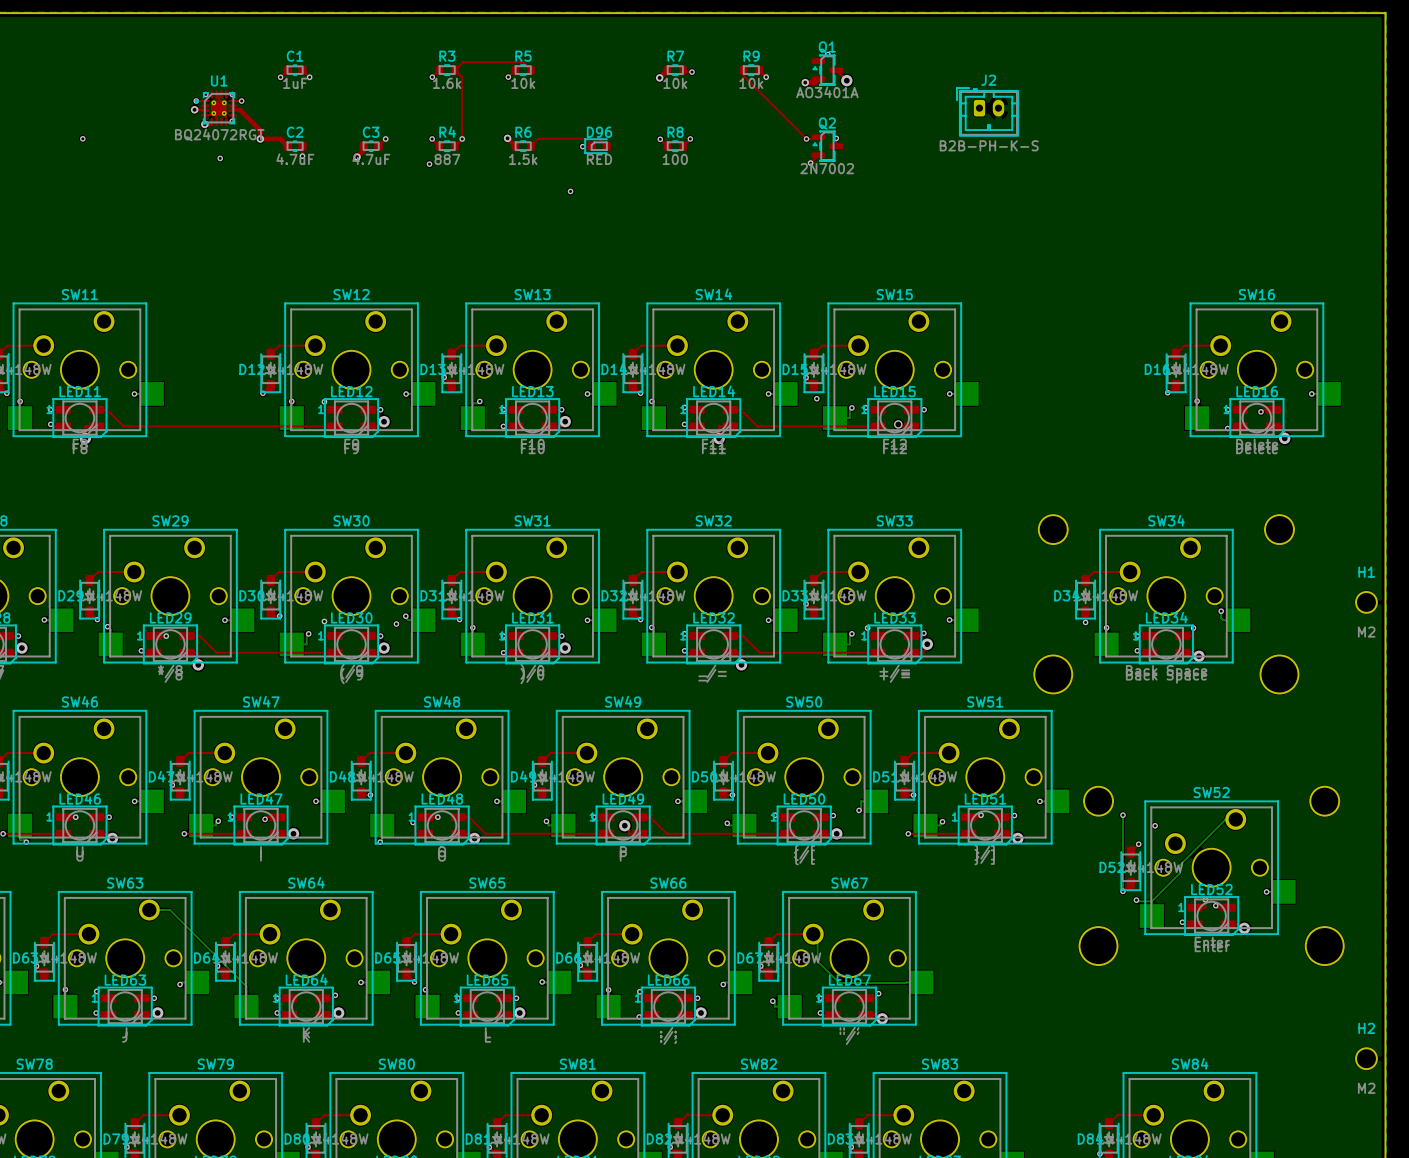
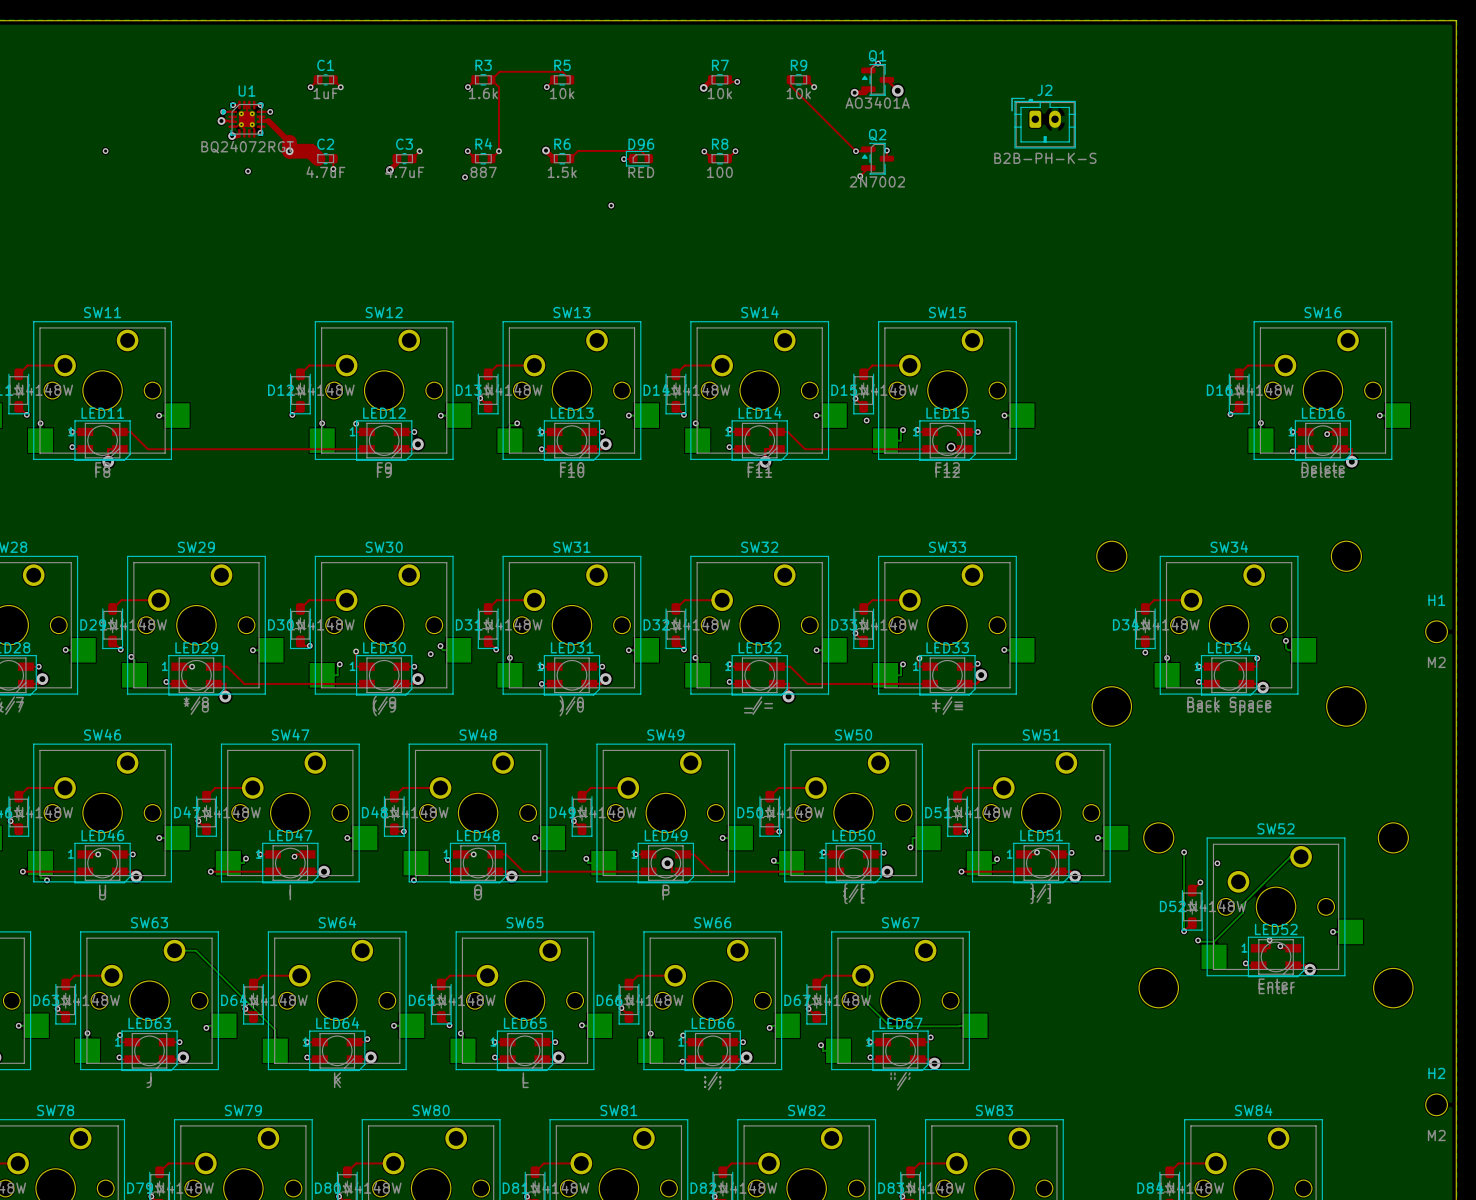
top track width: thin (239, 109) (260, 130) (260, 138) (280, 138) (287, 146) -> thick (268, 120) (289, 142) (289, 151) (310, 151) (318, 158)

